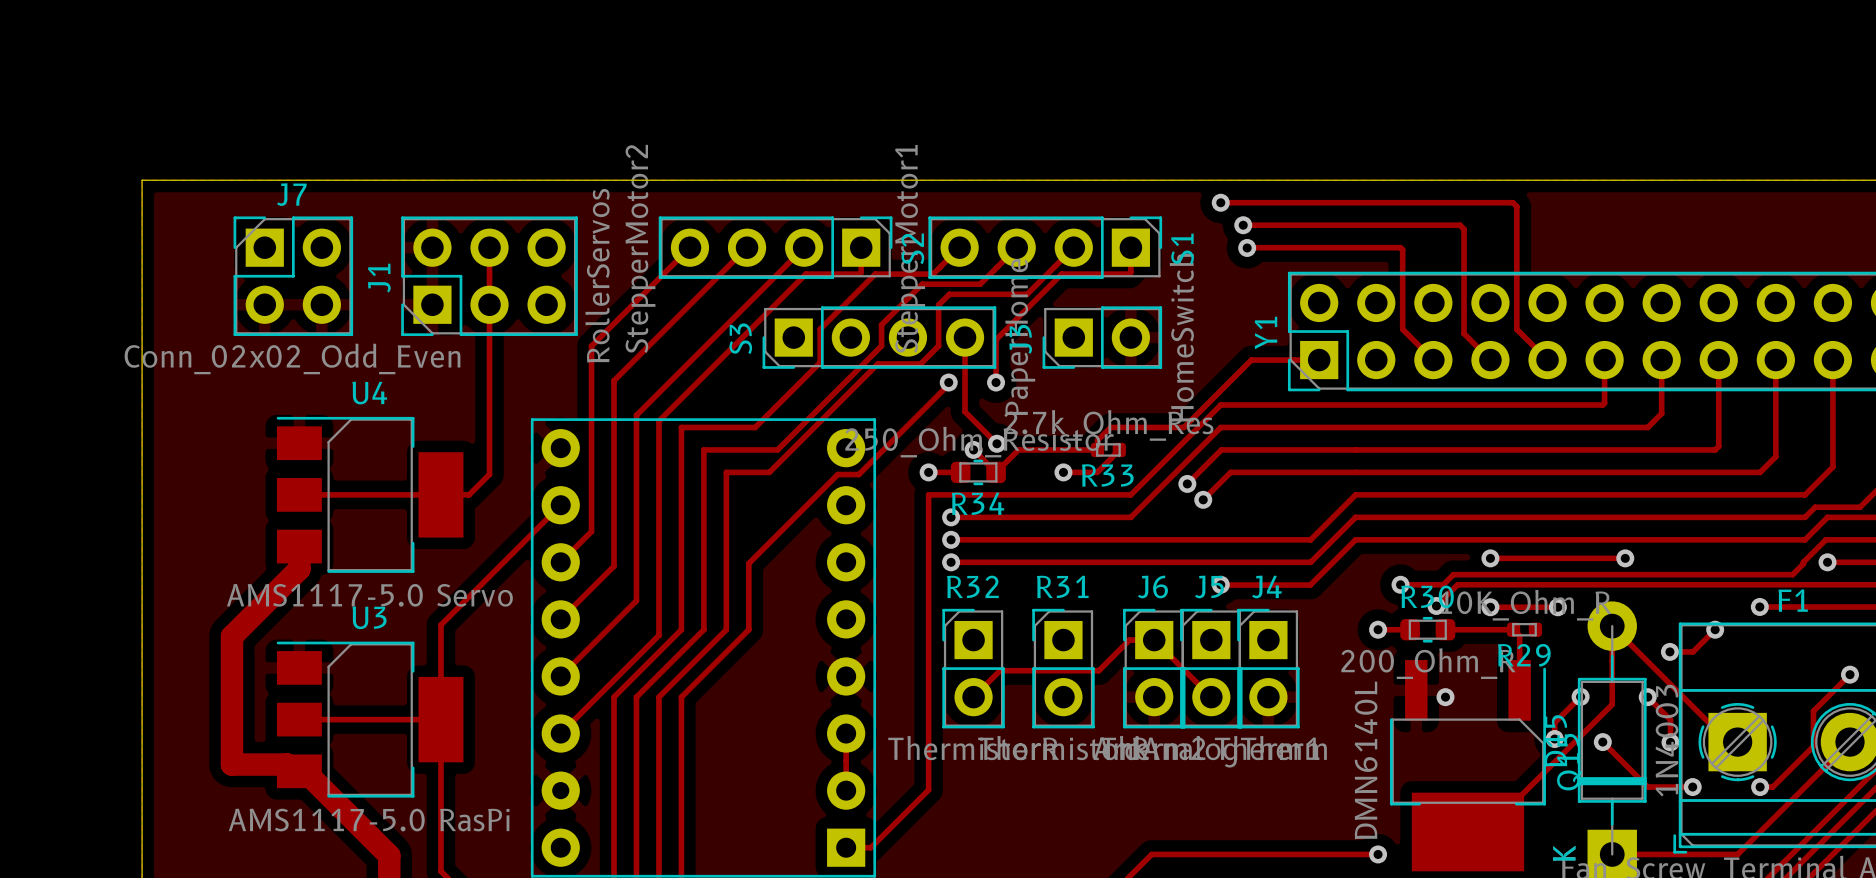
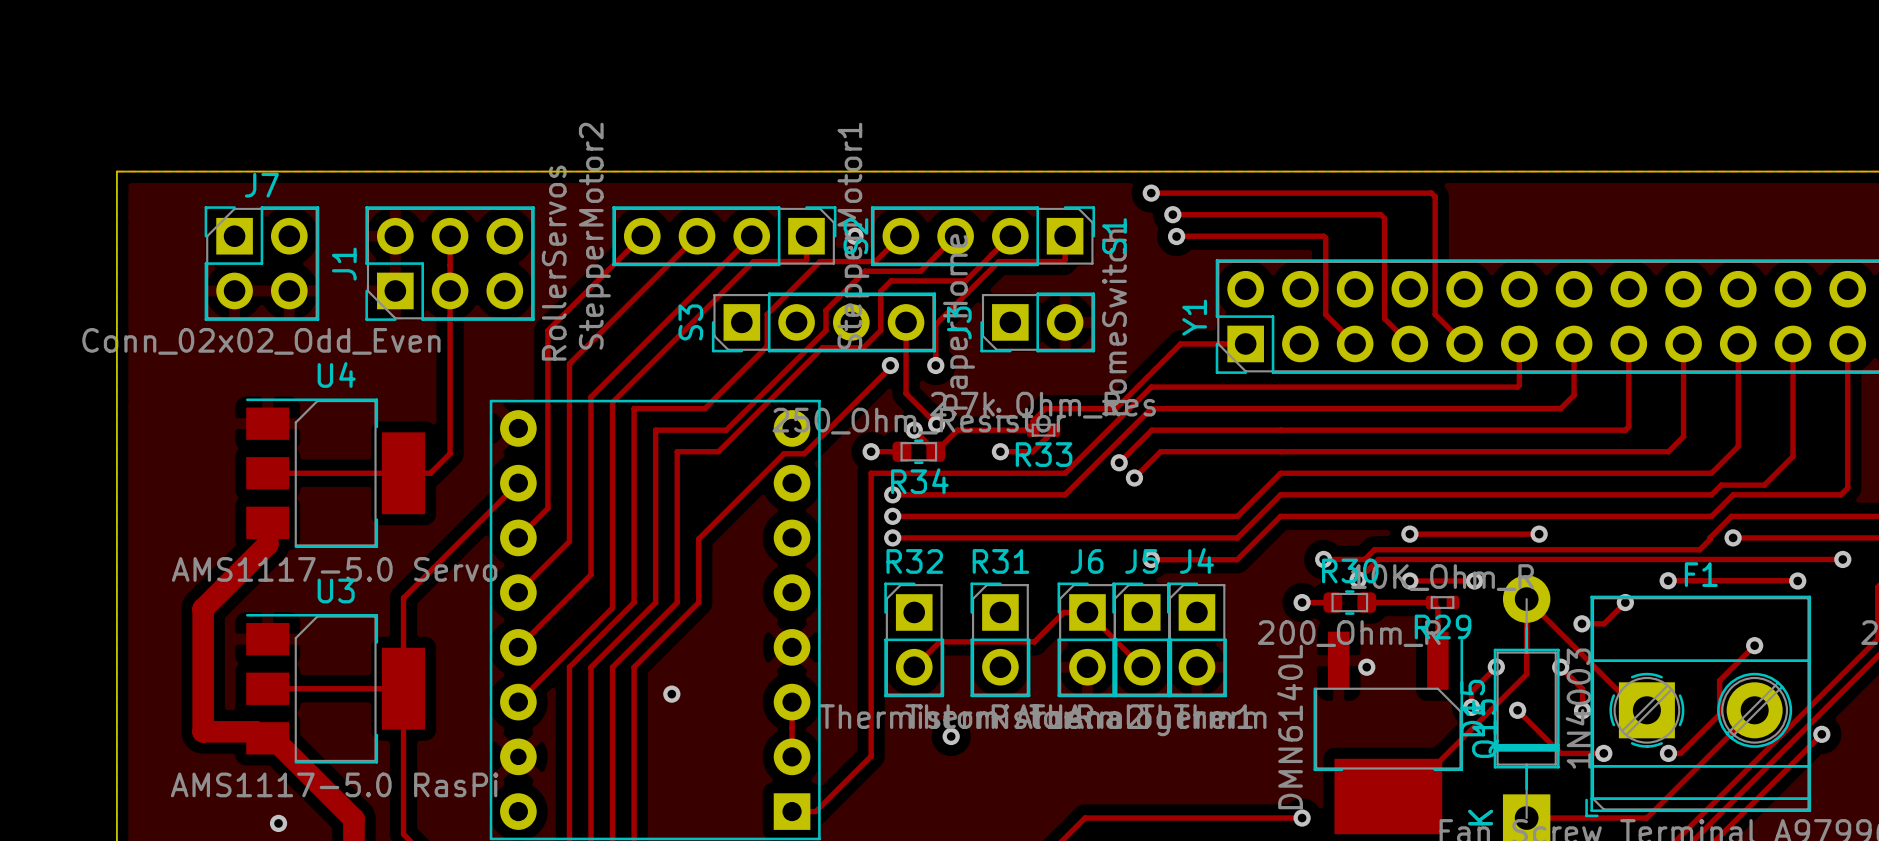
via: none -> (854, 236)
via: none -> (671, 694)
via: none -> (951, 736)
via: none -> (278, 823)

